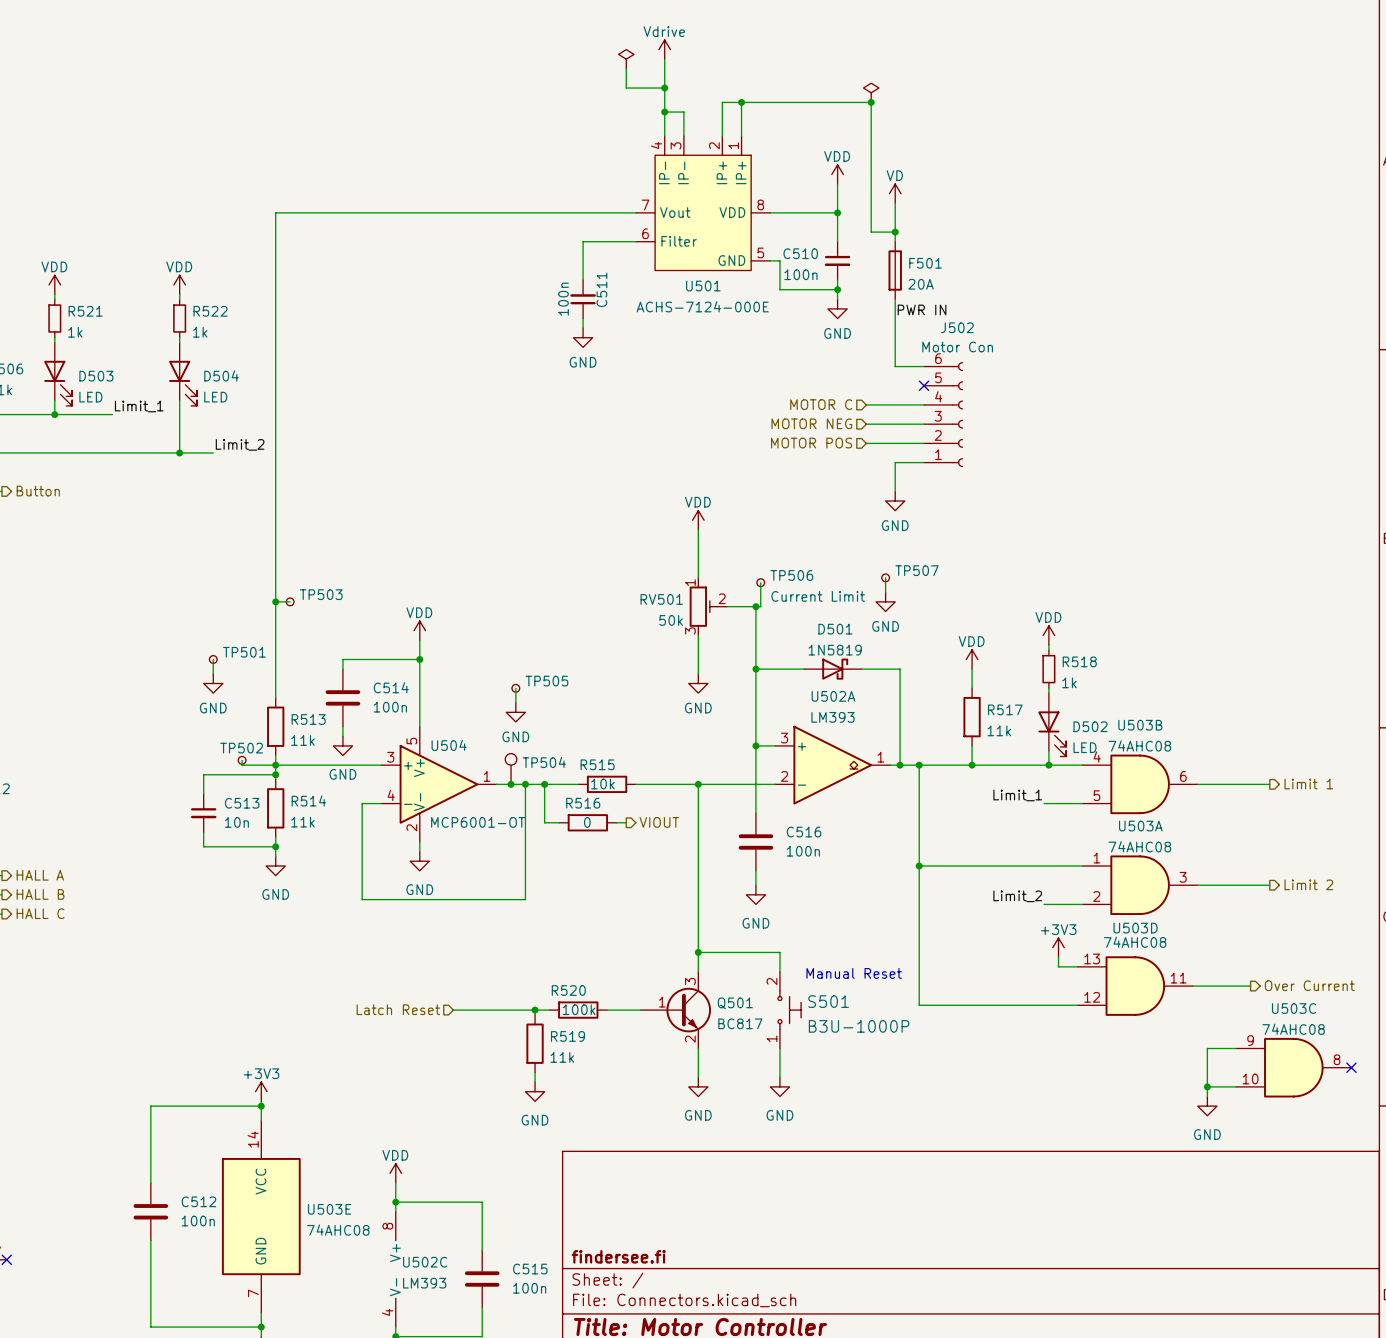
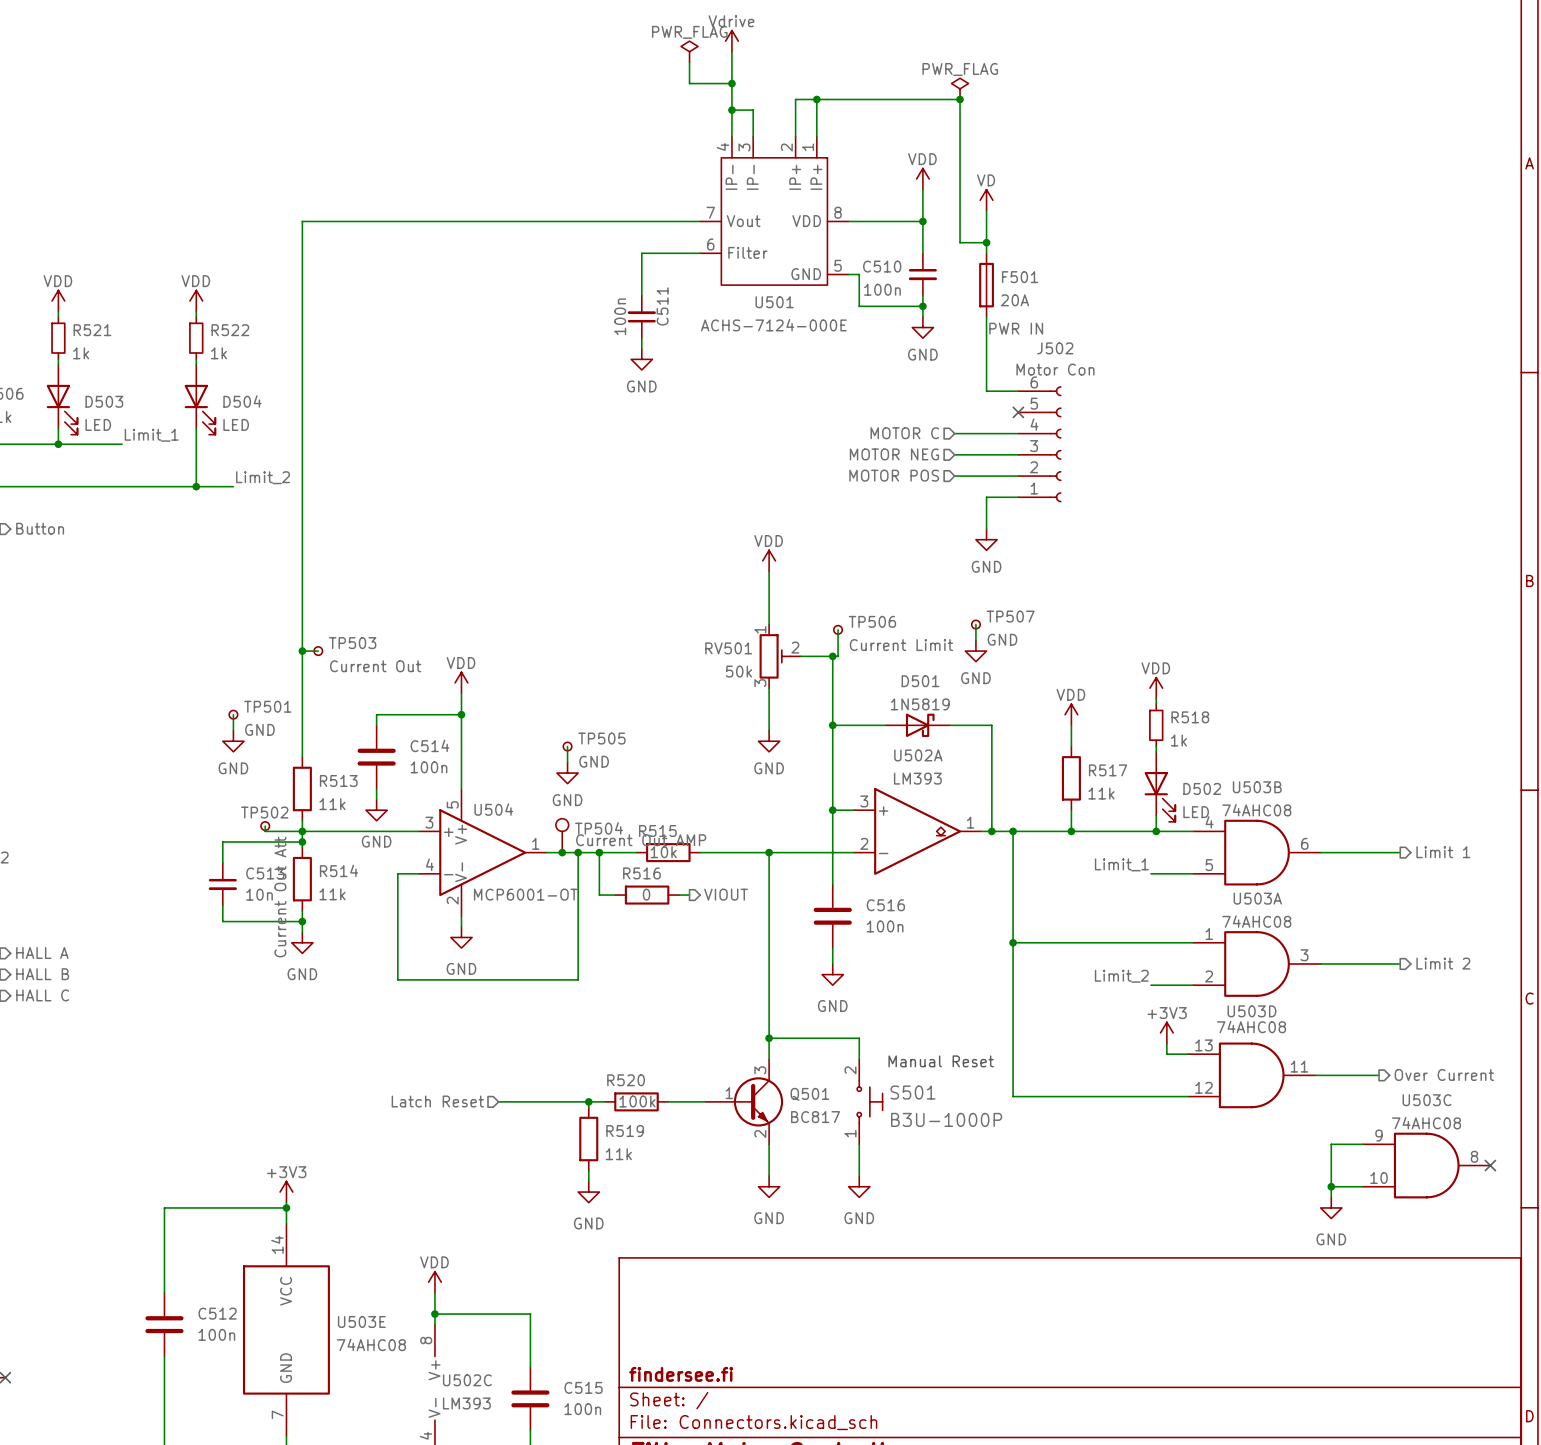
power symbol text: none -> PWR_FLAG (689, 32)
power symbol text: none -> PWR_FLAG (960, 69)
TP507 value: none -> GND (1002, 639)
TP503 value: none -> Current Out (375, 666)
TP501 value: none -> GND (259, 729)
TP505 value: none -> GND (594, 761)
TP504 value: none -> Current Out AMP (641, 840)
TP502 value: none -> Current Out Att (280, 897)

